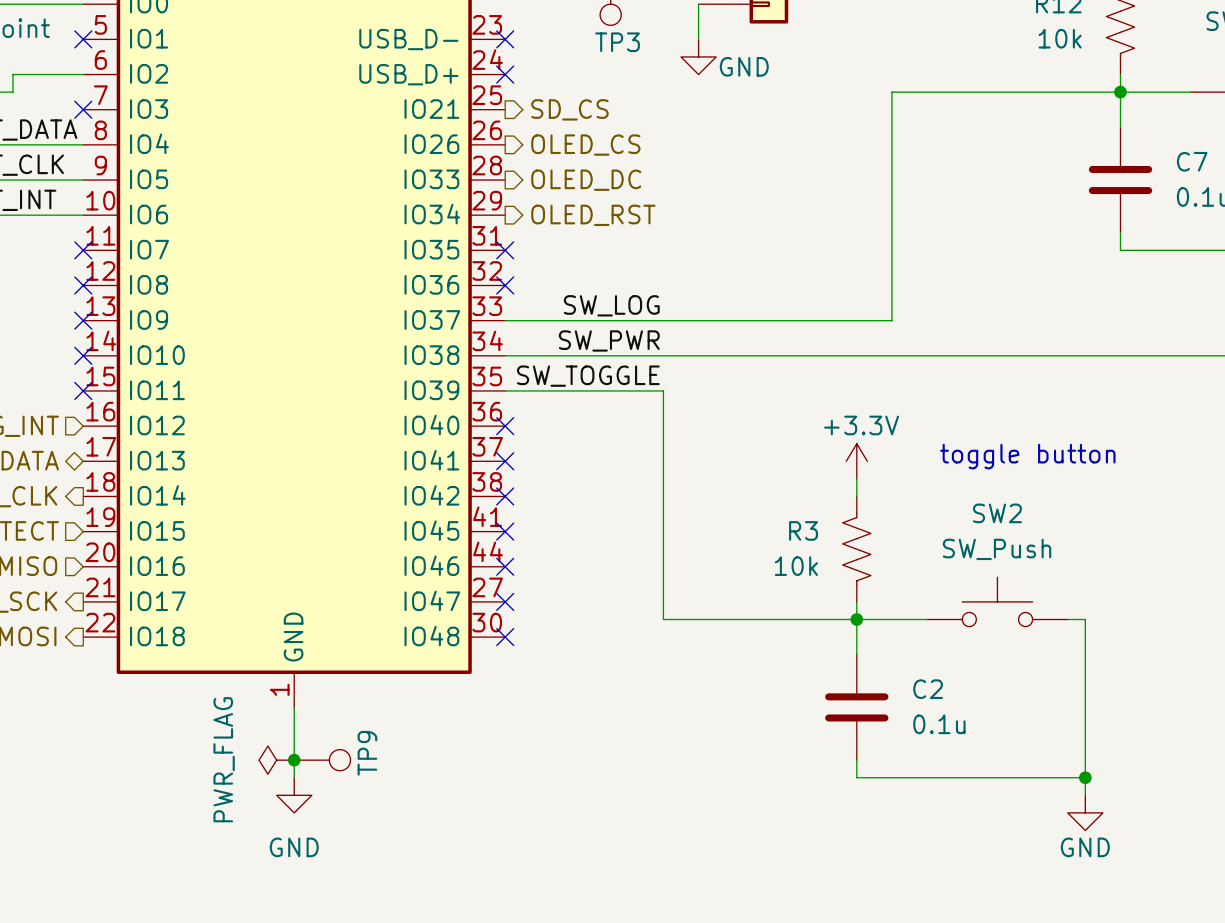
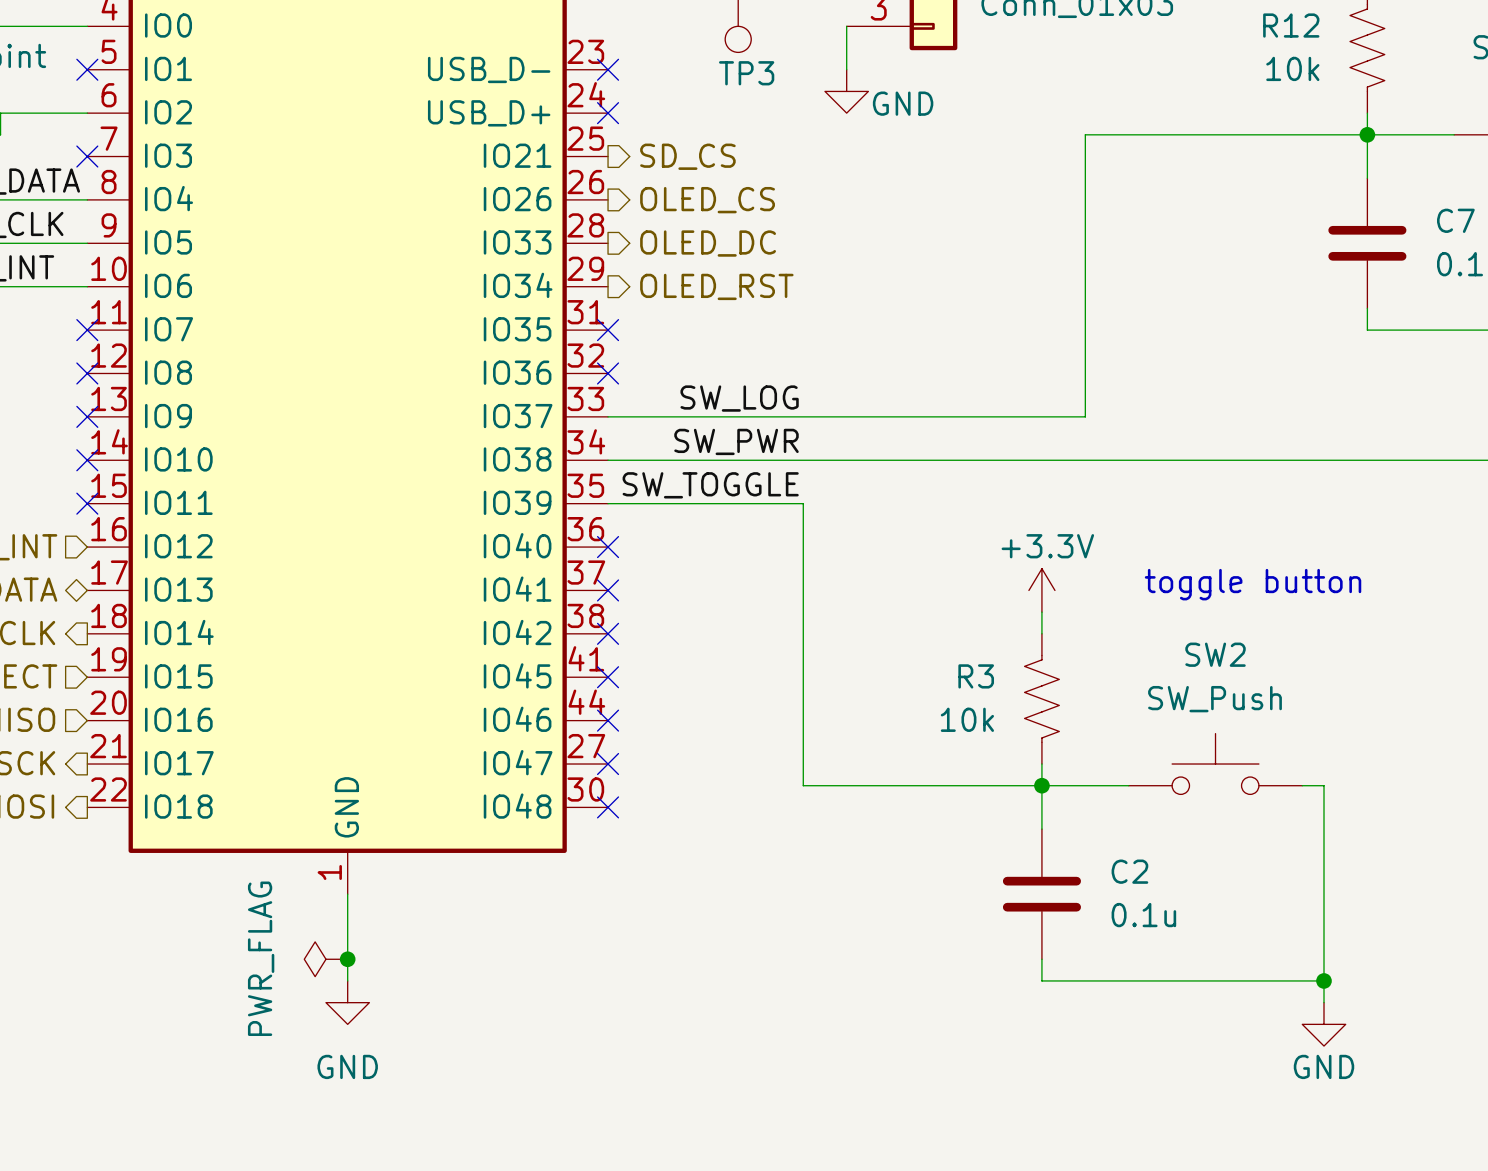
TP9: (322, 760) -> none

